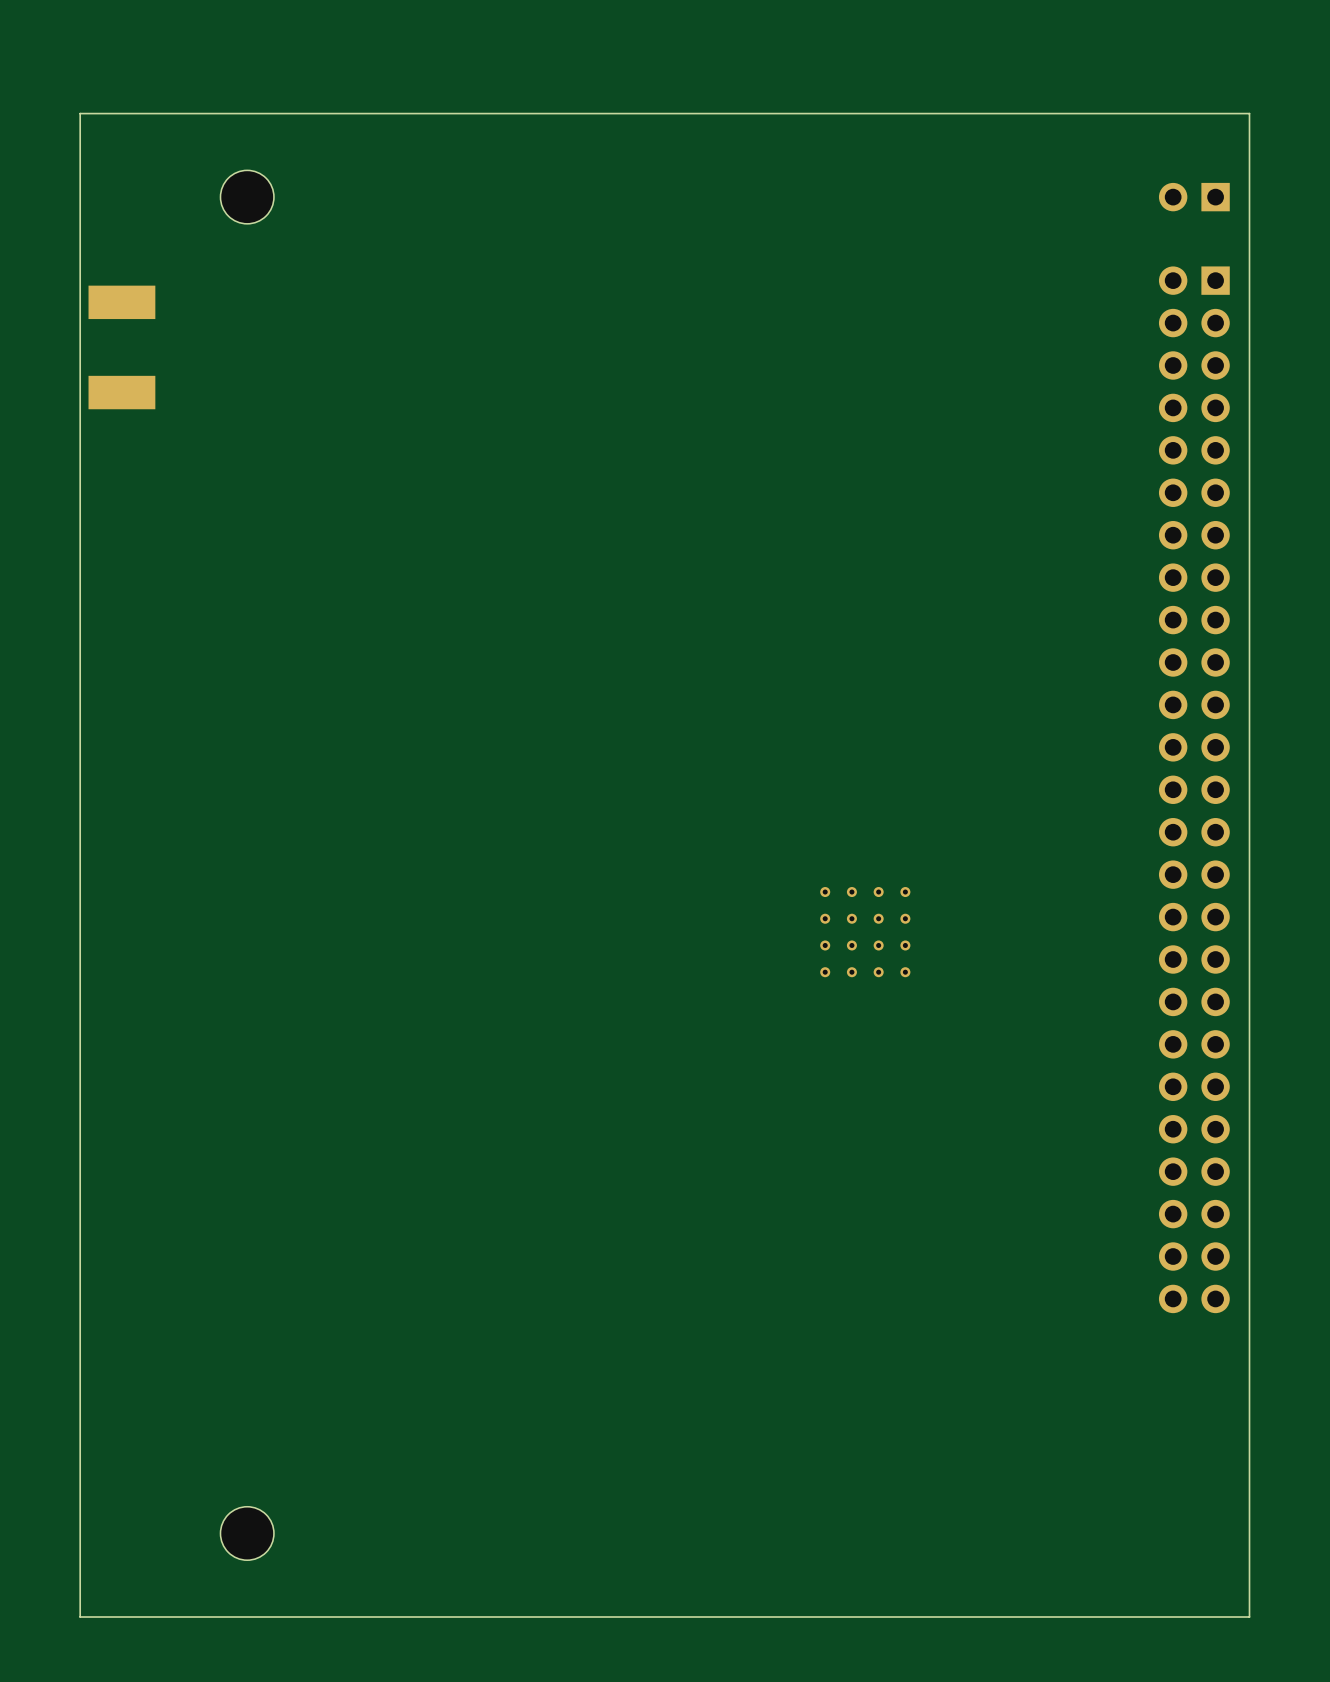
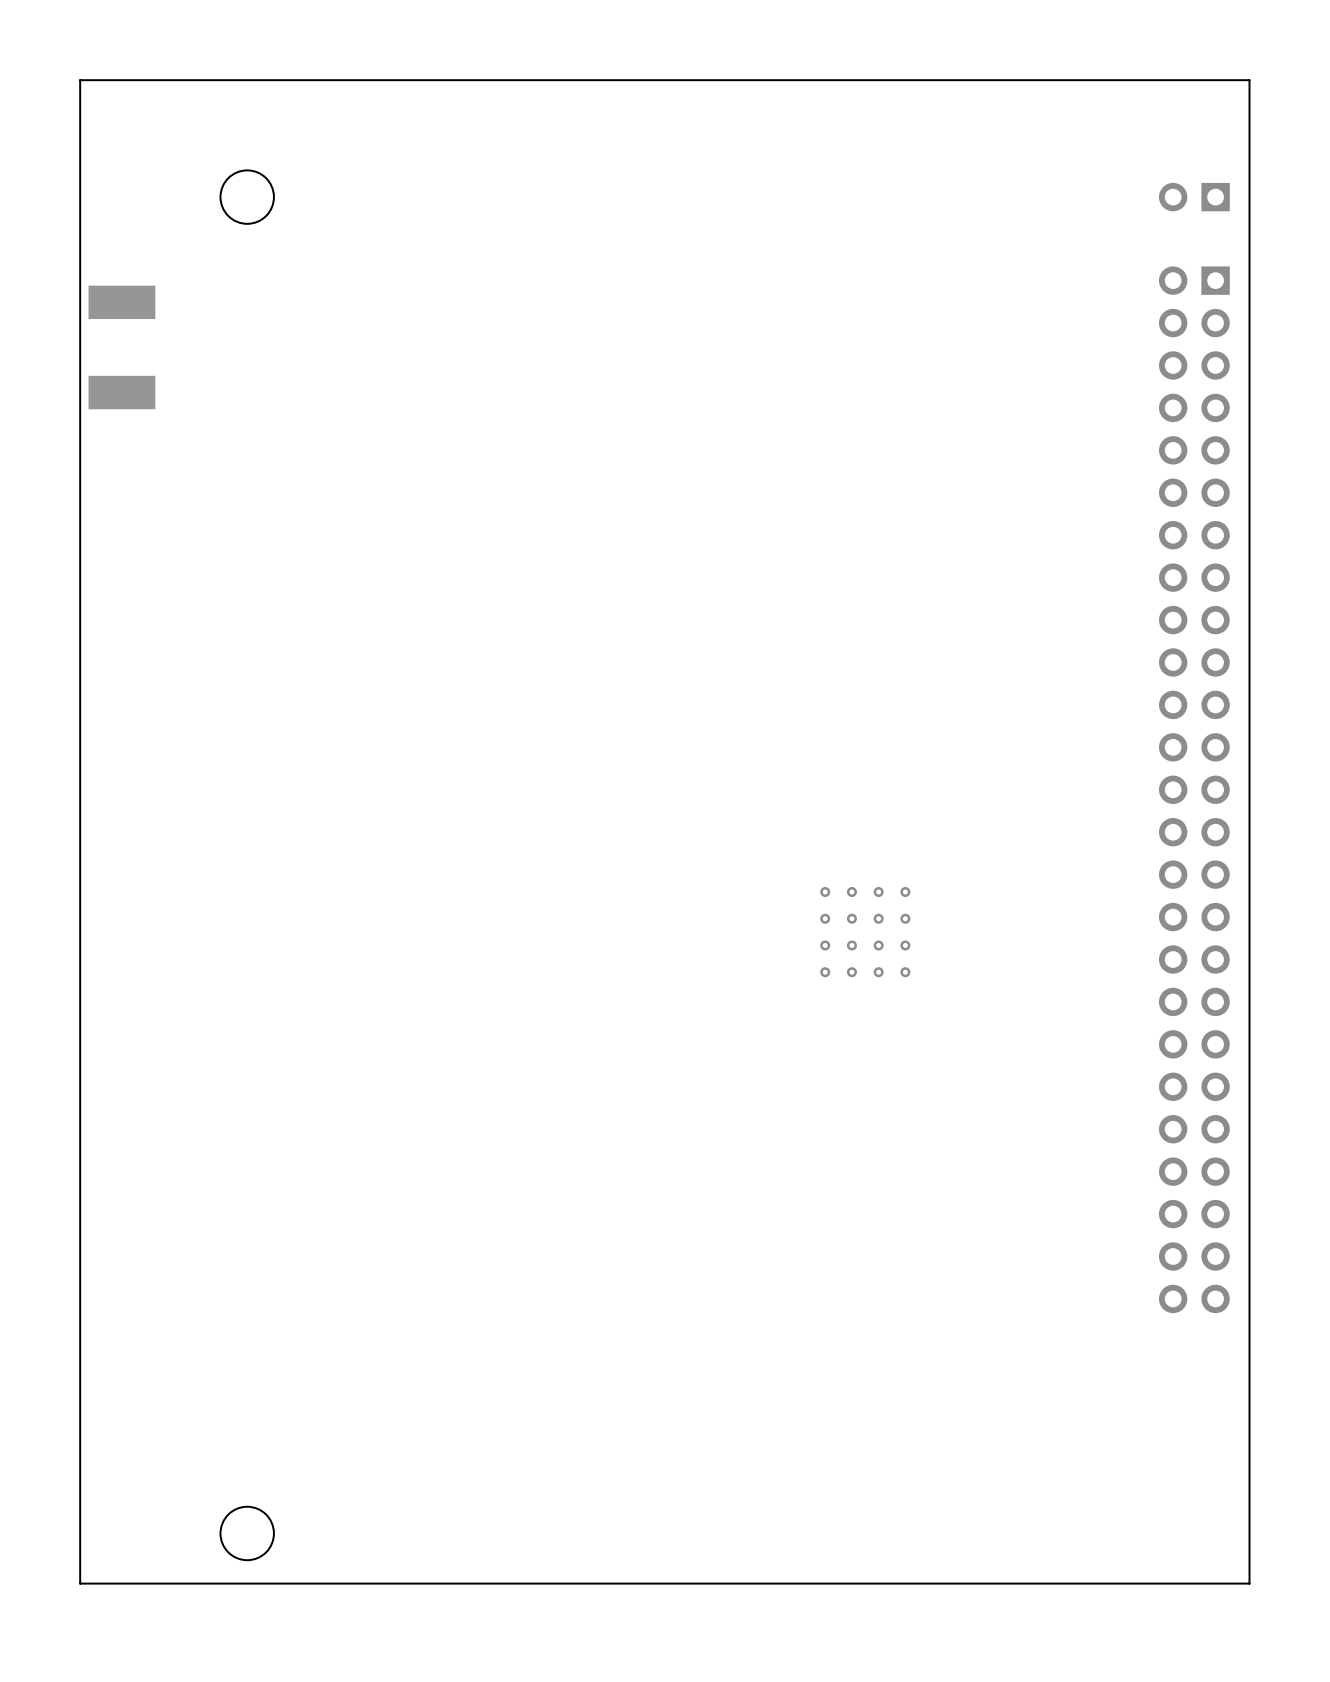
board edge: (1249, 113) (80, 113) -> (1249, 113) (1249, 80) (80, 80) (80, 113)
board edge: (1249, 1583) (1249, 1617) (80, 1617) (80, 1583) -> (1249, 1583) (80, 1583)

